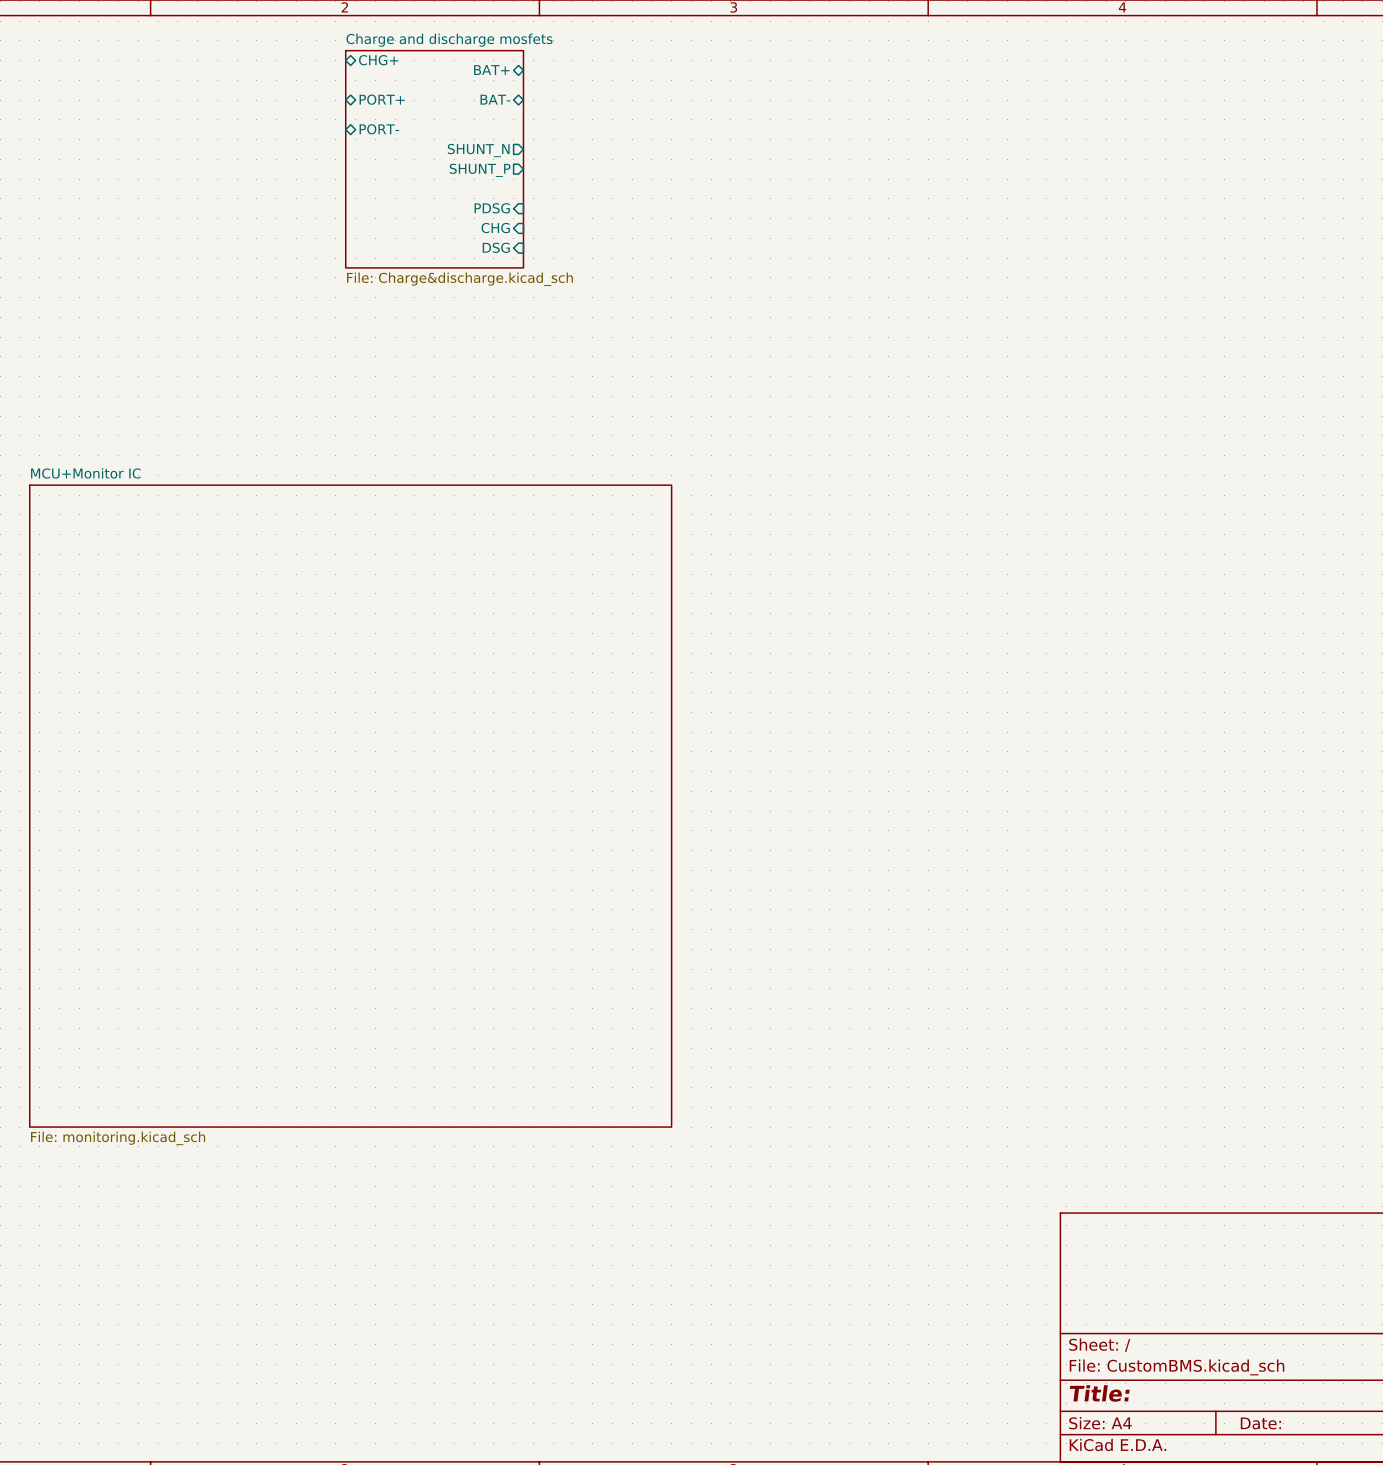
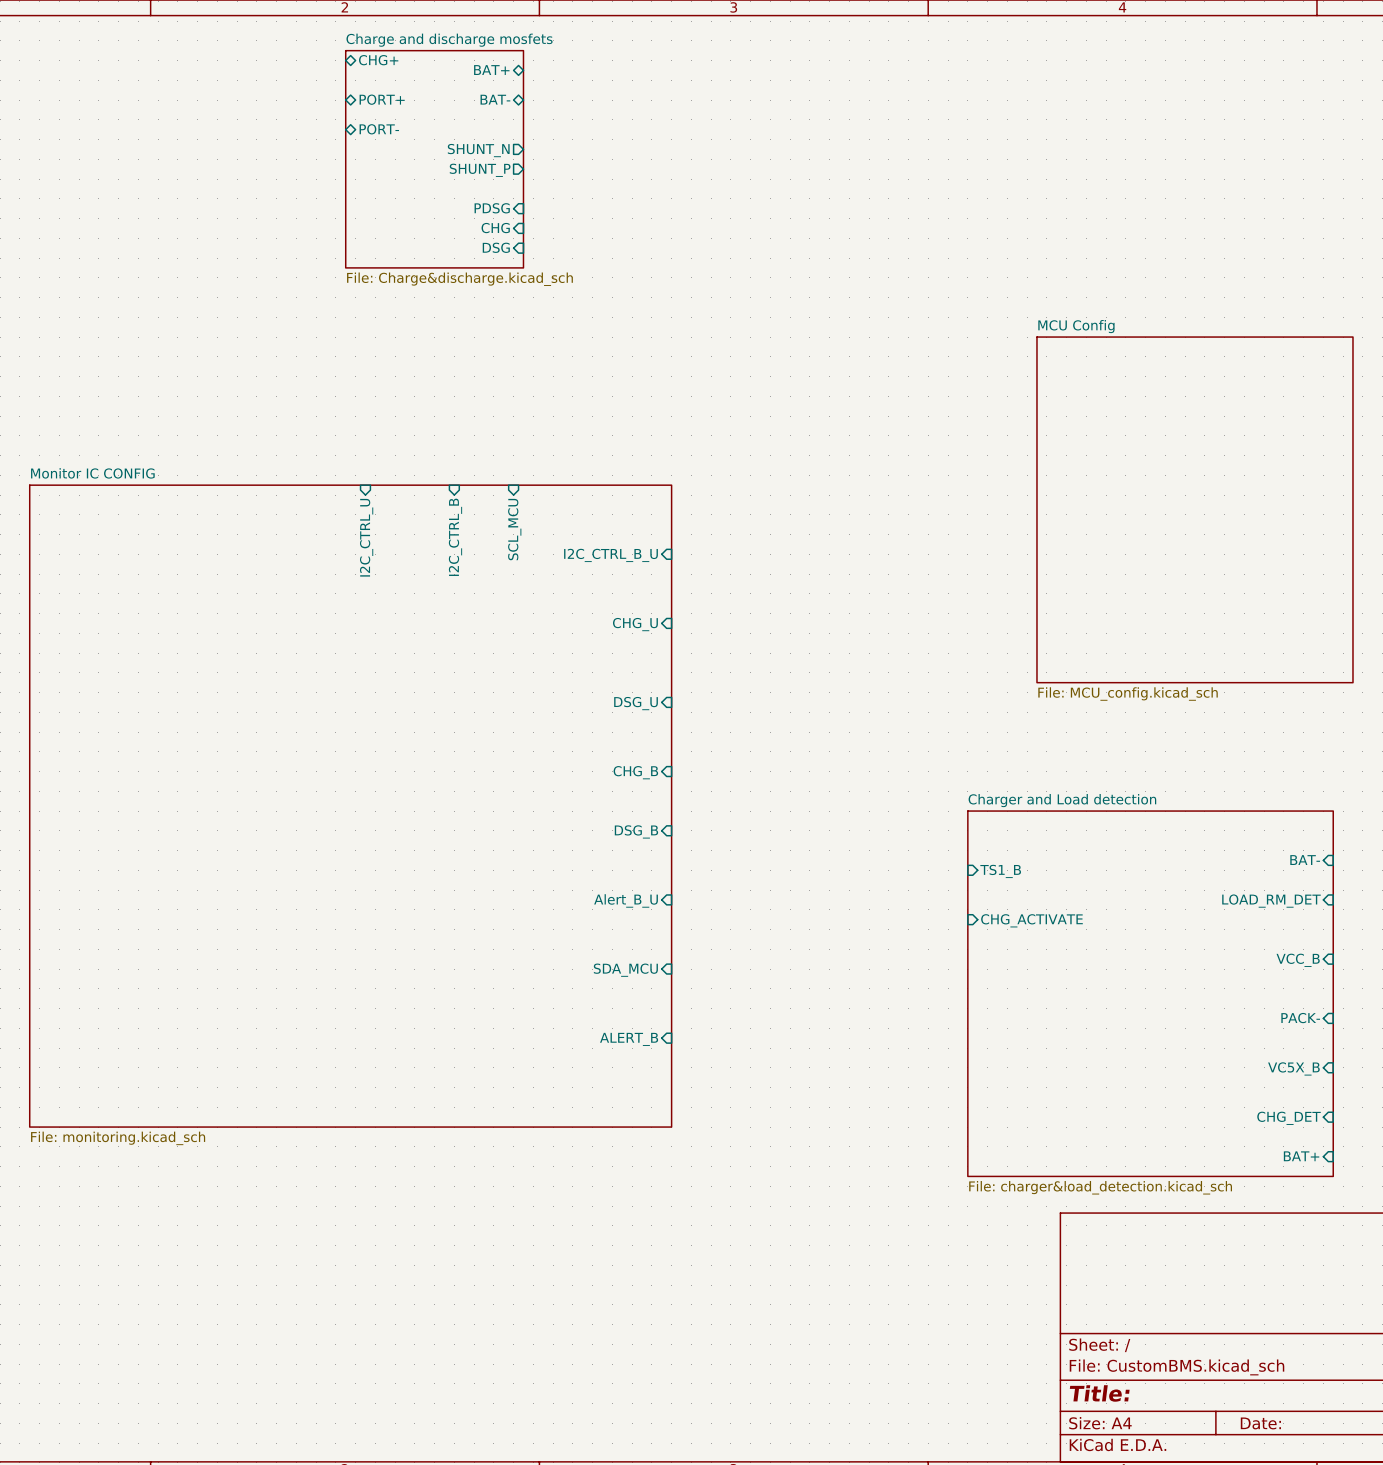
sheet MCU+Monitor IC name: MCU+Monitor IC (85, 473) -> Monitor IC CONFIG (92, 473)
sheet MCU Config: none -> File: MCU_config.kicad_sch (1194, 509)
sheet pin: none -> SCL_MCU (514, 529)
sheet pin: none -> I2C_CTRL_U (366, 537)
sheet pin: none -> I2C_CTRL_B (455, 537)
sheet pin: none -> I2C_CTRL_B_U (610, 555)
sheet pin: none -> CHG_U (635, 624)
sheet pin: none -> DSG_U (636, 703)
sheet pin: none -> CHG_B (635, 772)
sheet pin: none -> DSG_B (636, 831)
sheet pin: none -> BAT- (1305, 860)
sheet pin: none -> TS1_B (1000, 871)
sheet pin: none -> Alert_B_U (626, 900)
sheet pin: none -> LOAD_RM_DET (1271, 901)
sheet pin: none -> CHG_ACTIVATE (1031, 920)
sheet pin: none -> VCC_B (1298, 960)
sheet pin: none -> SDA_MCU (625, 970)
sheet Charger and Load detection: none -> File: charger&load_detection.kicad_sch (1150, 993)
sheet pin: none -> PACK- (1300, 1018)
sheet pin: none -> ALERT_B (629, 1039)
sheet pin: none -> VC5X_B (1293, 1068)
sheet pin: none -> CHG_DET (1289, 1118)
sheet pin: none -> BAT+ (1301, 1156)

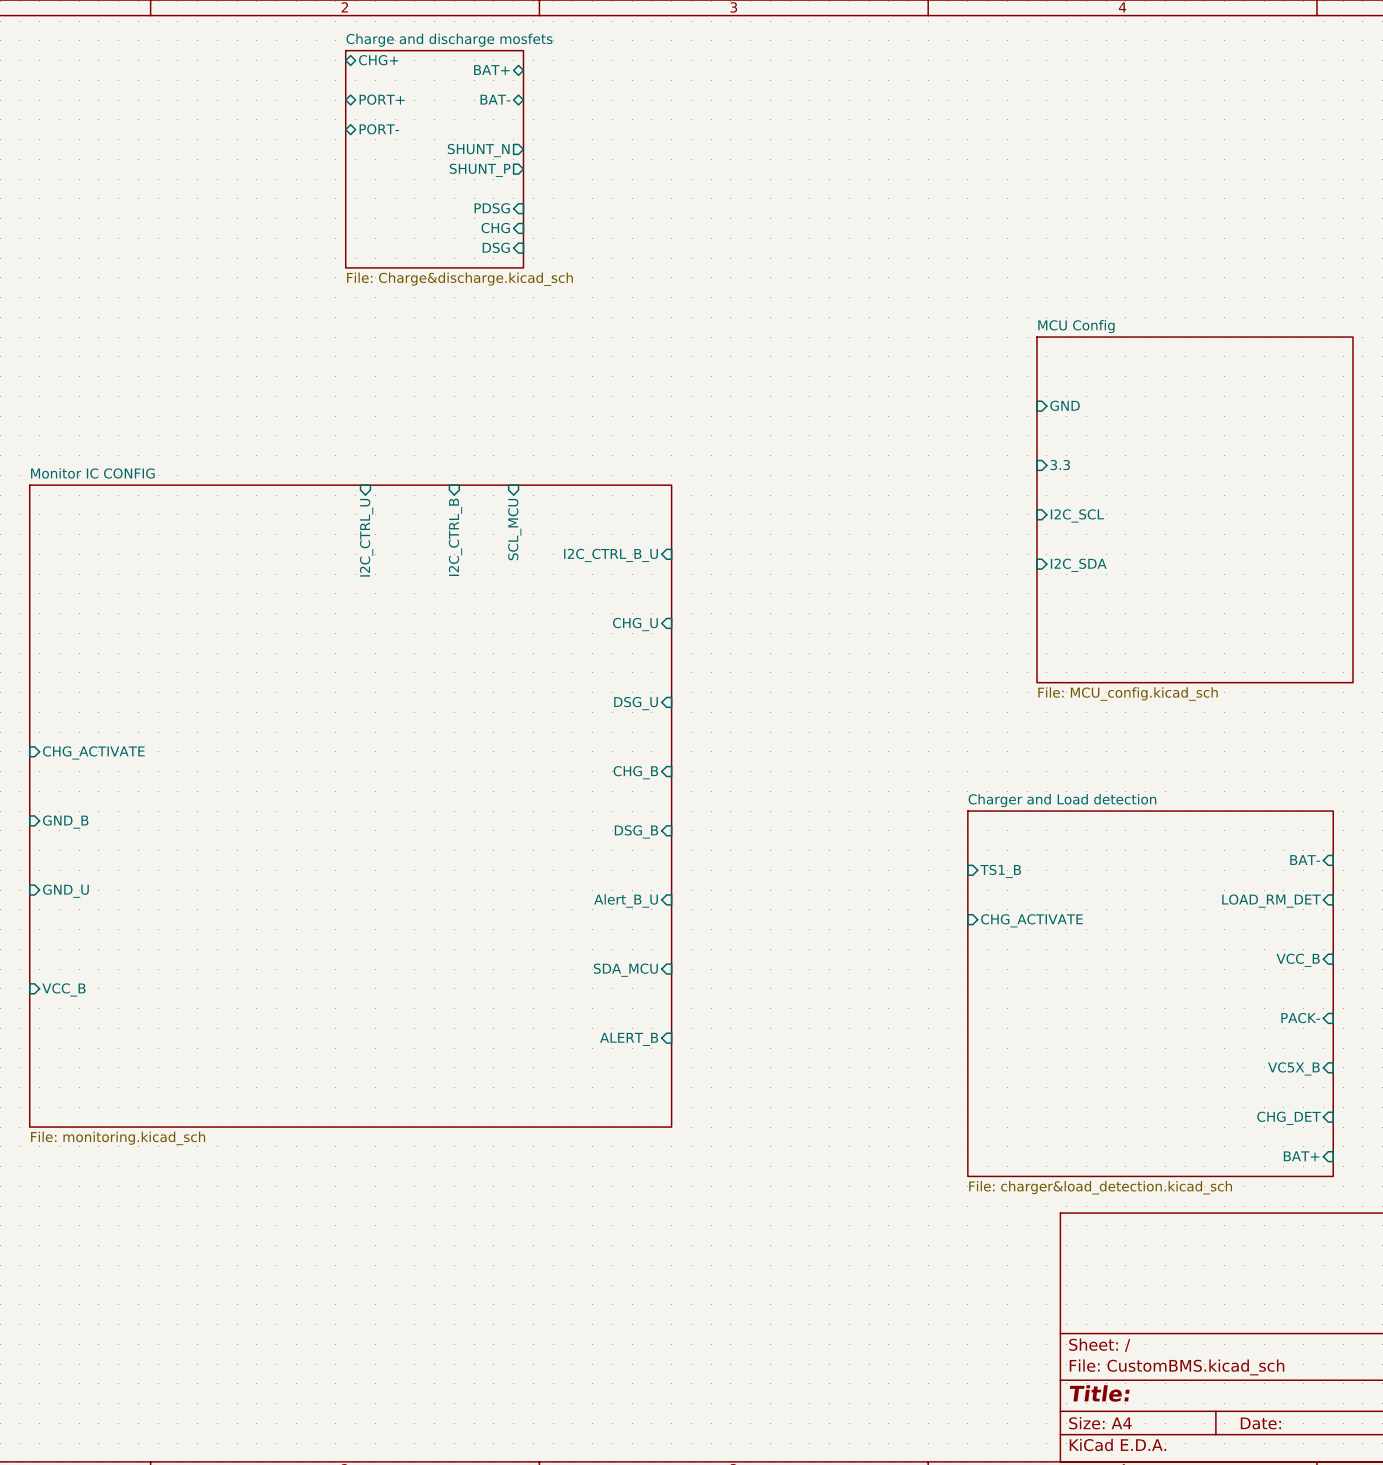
sheet pin: none -> GND (1065, 405)
sheet pin: none -> 3.3 (1060, 465)
sheet pin: none -> I2C_SCL (1077, 515)
sheet pin: none -> I2C_SDA (1078, 565)
sheet pin: none -> CHG_ACTIVATE (93, 752)
sheet pin: none -> GND_B (65, 822)
sheet pin: none -> GND_U (65, 891)
sheet pin: none -> VCC_B (63, 989)

